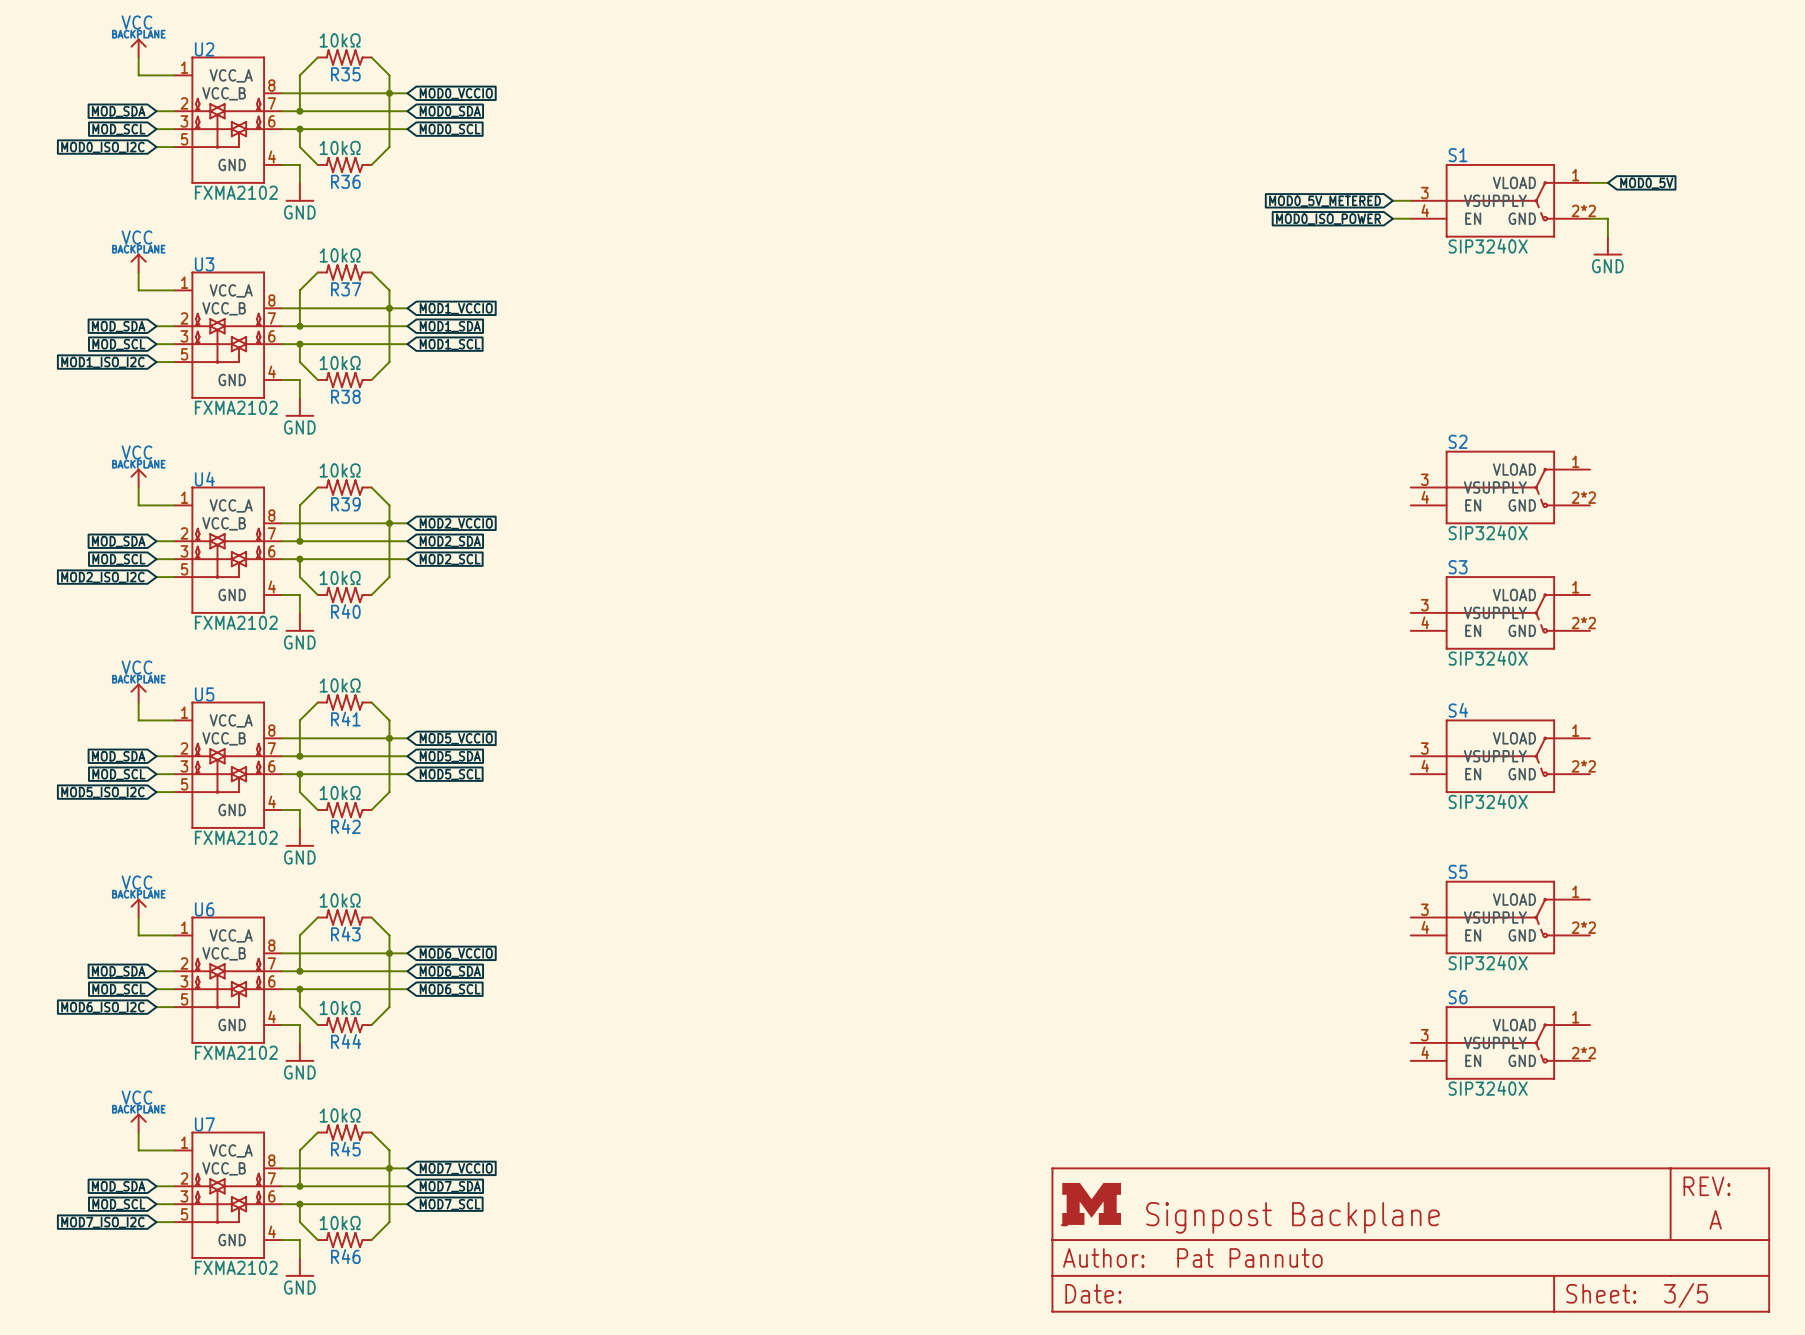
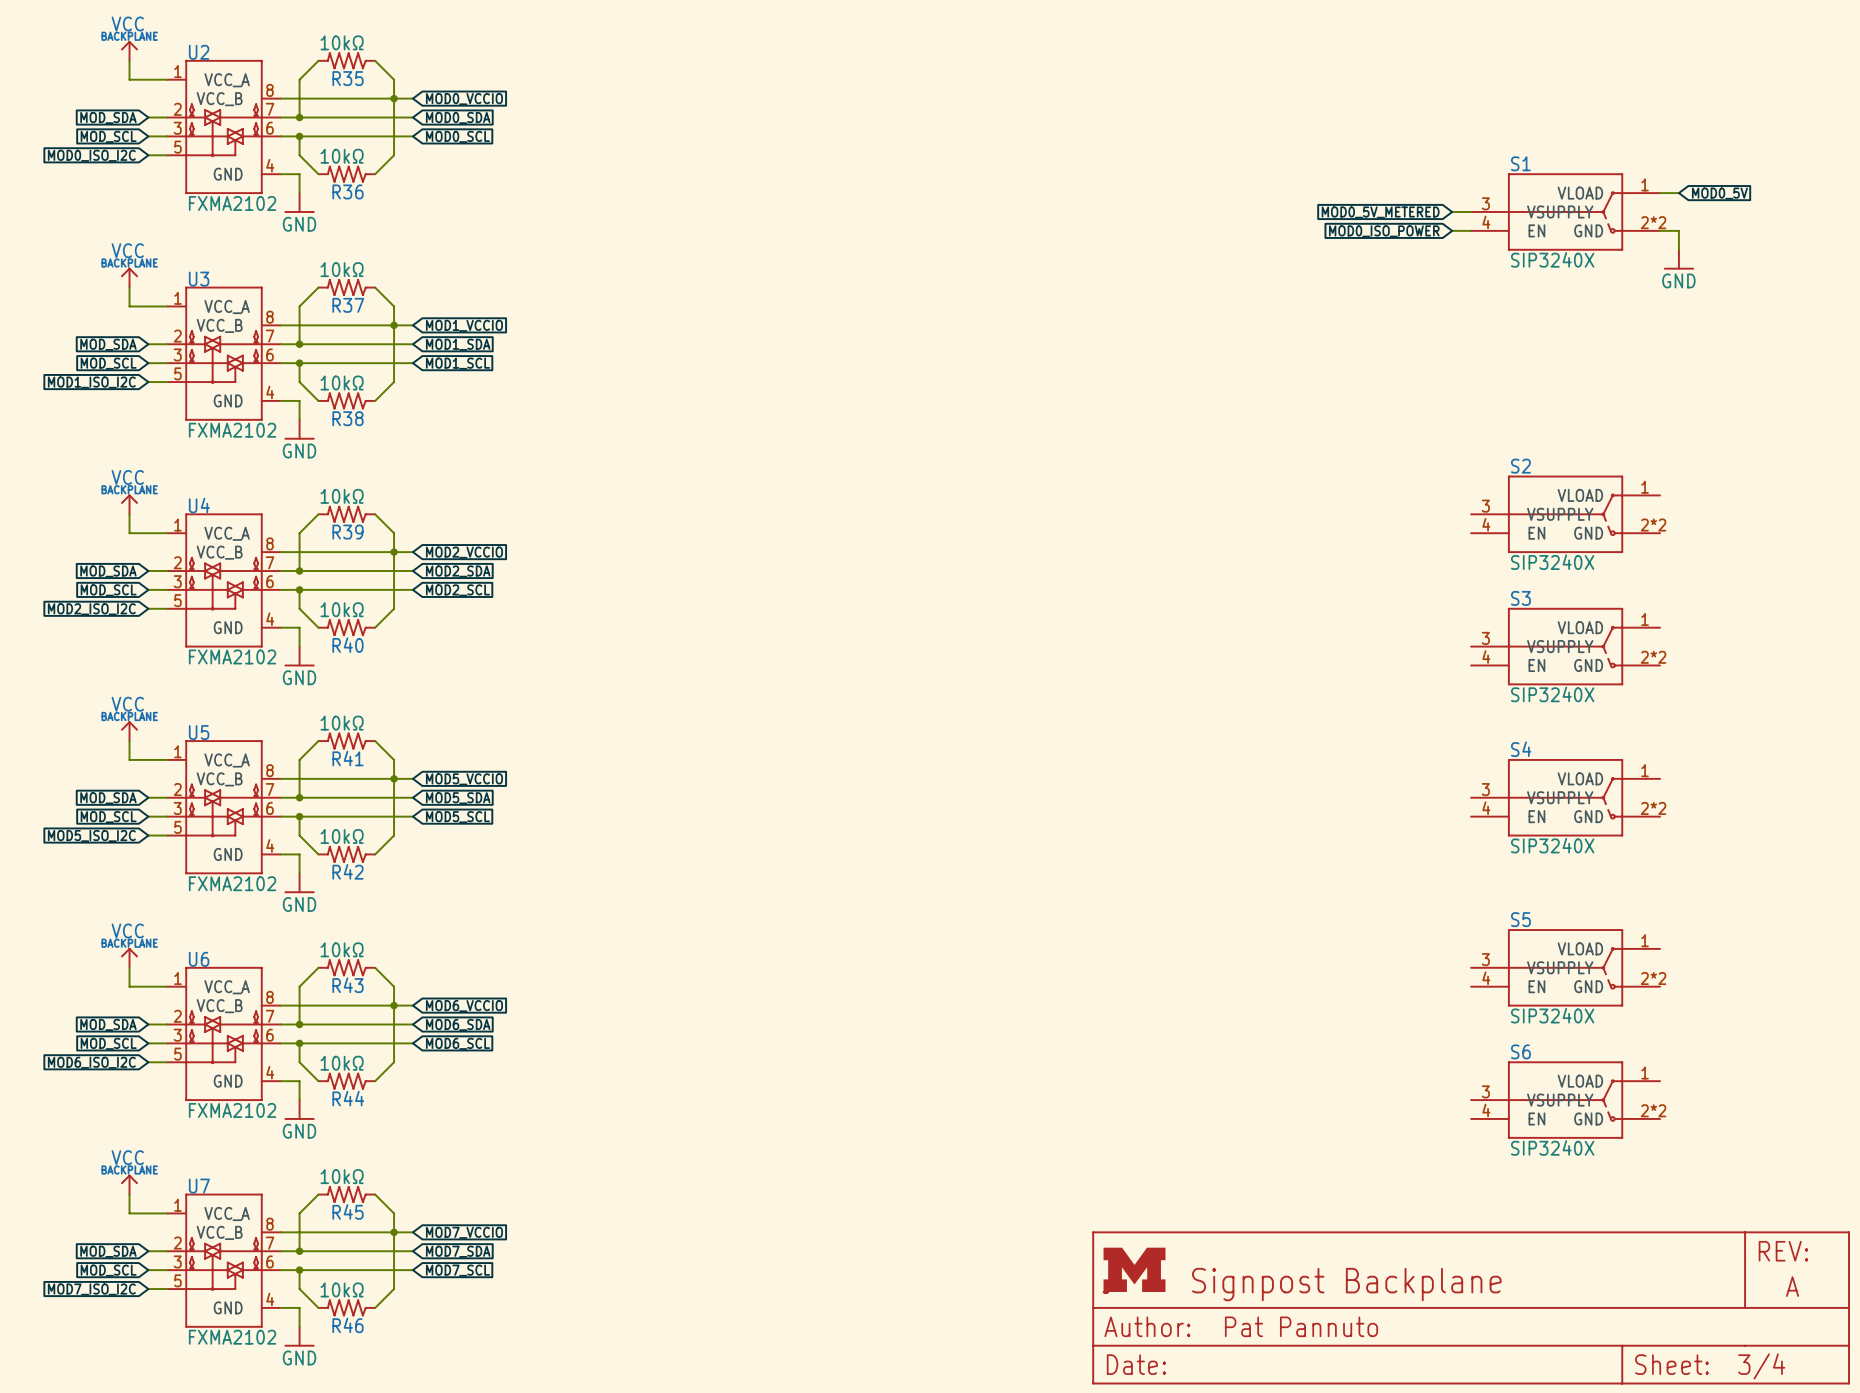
part text: 3/5 (1686, 1295) -> 3/4 (1761, 1366)

